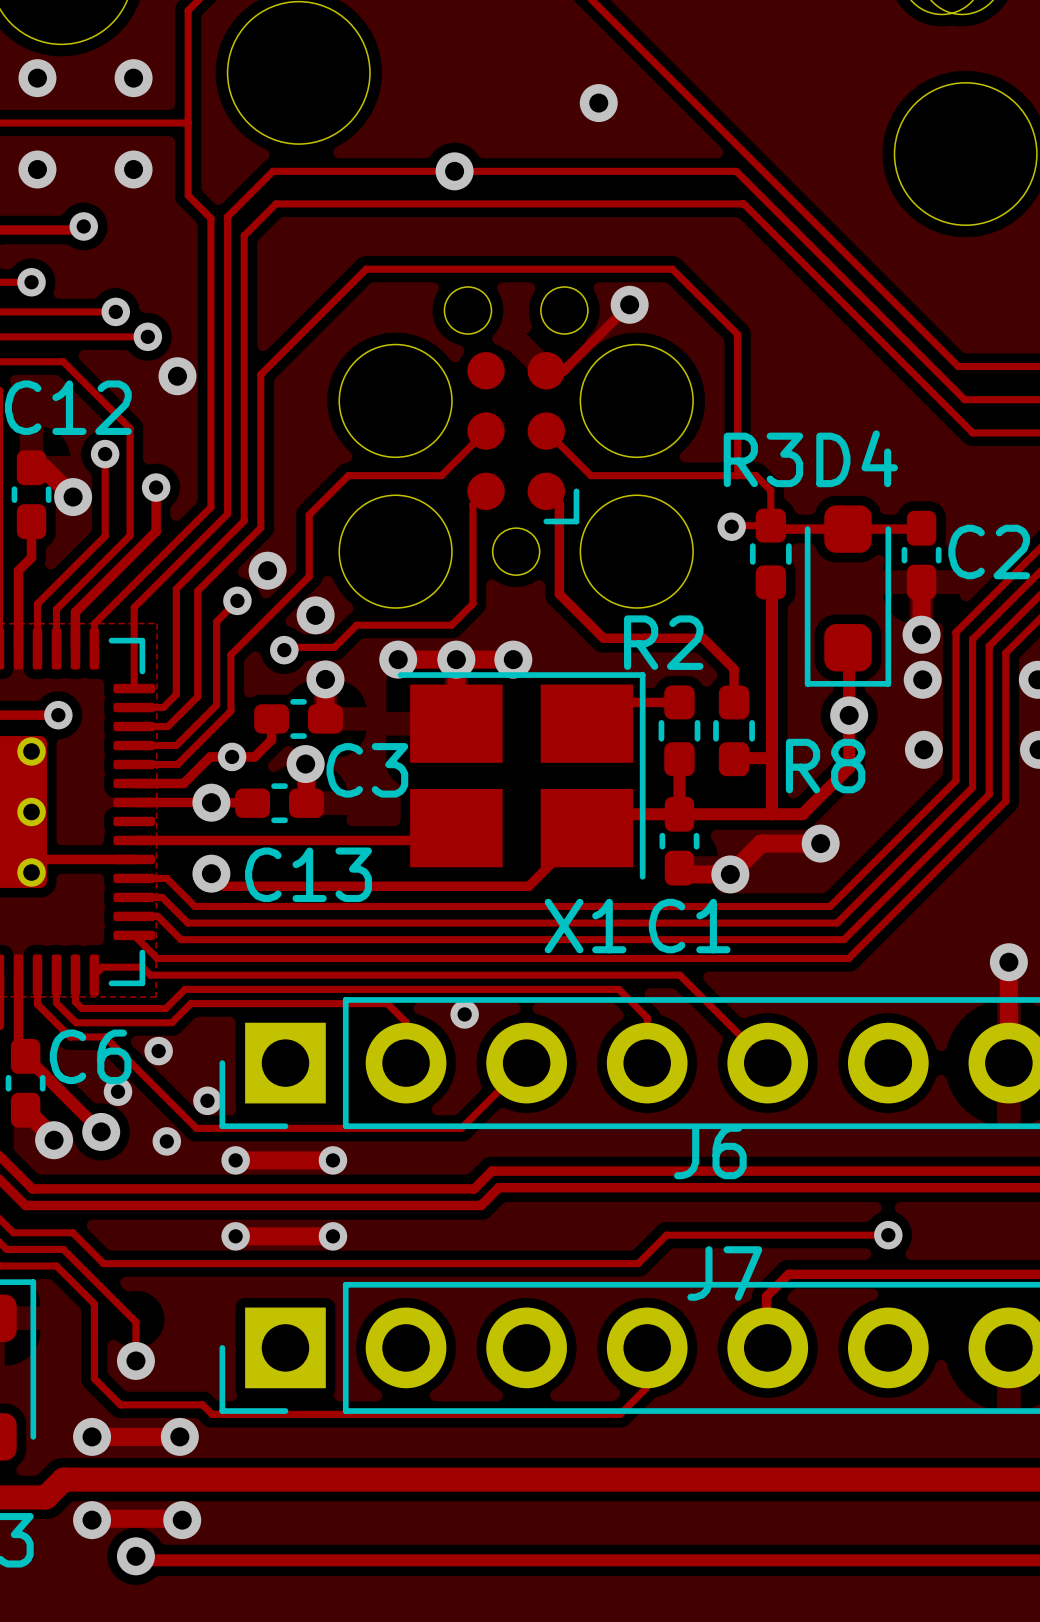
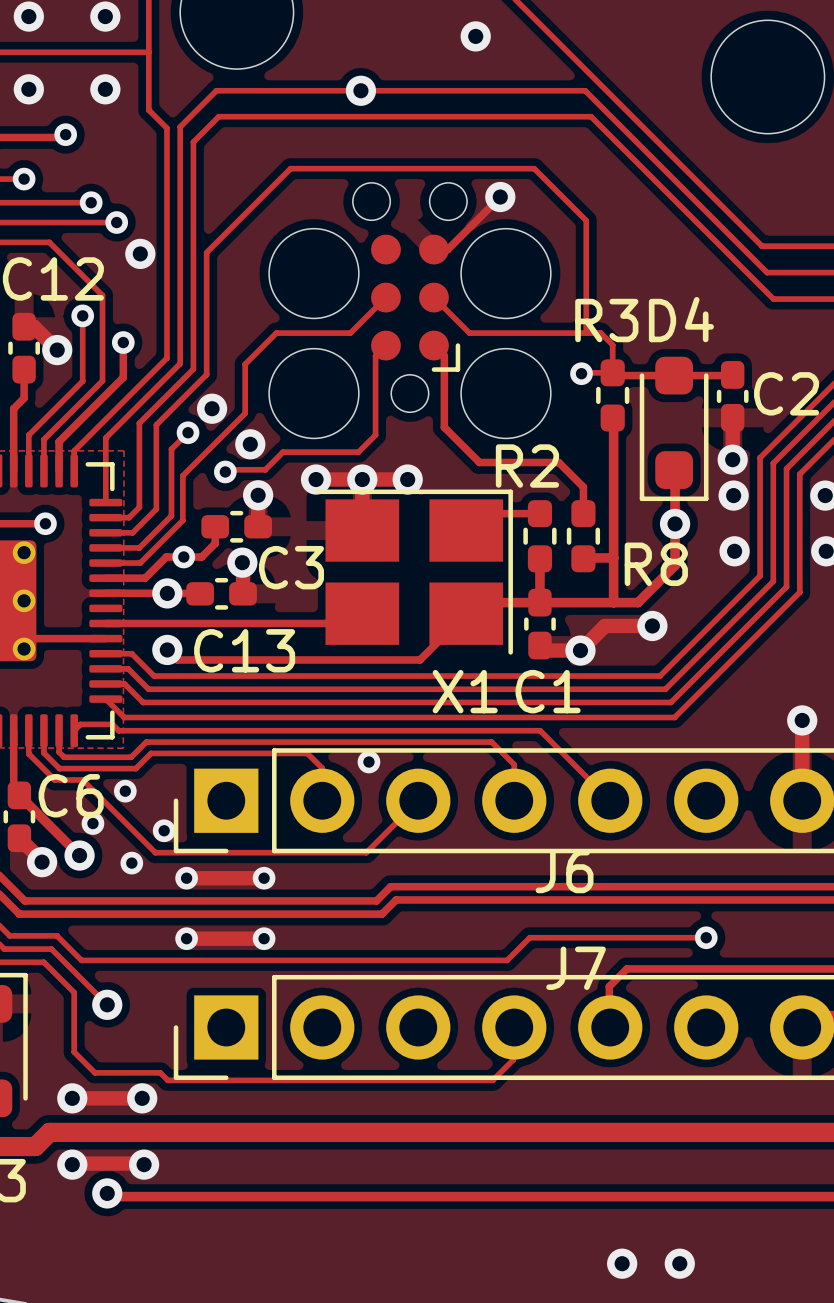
track: (63, 1249) (135, 1322) (135, 1360) -> (49, 949) (107, 1004)
via position: (135, 1360) -> (107, 1004)

